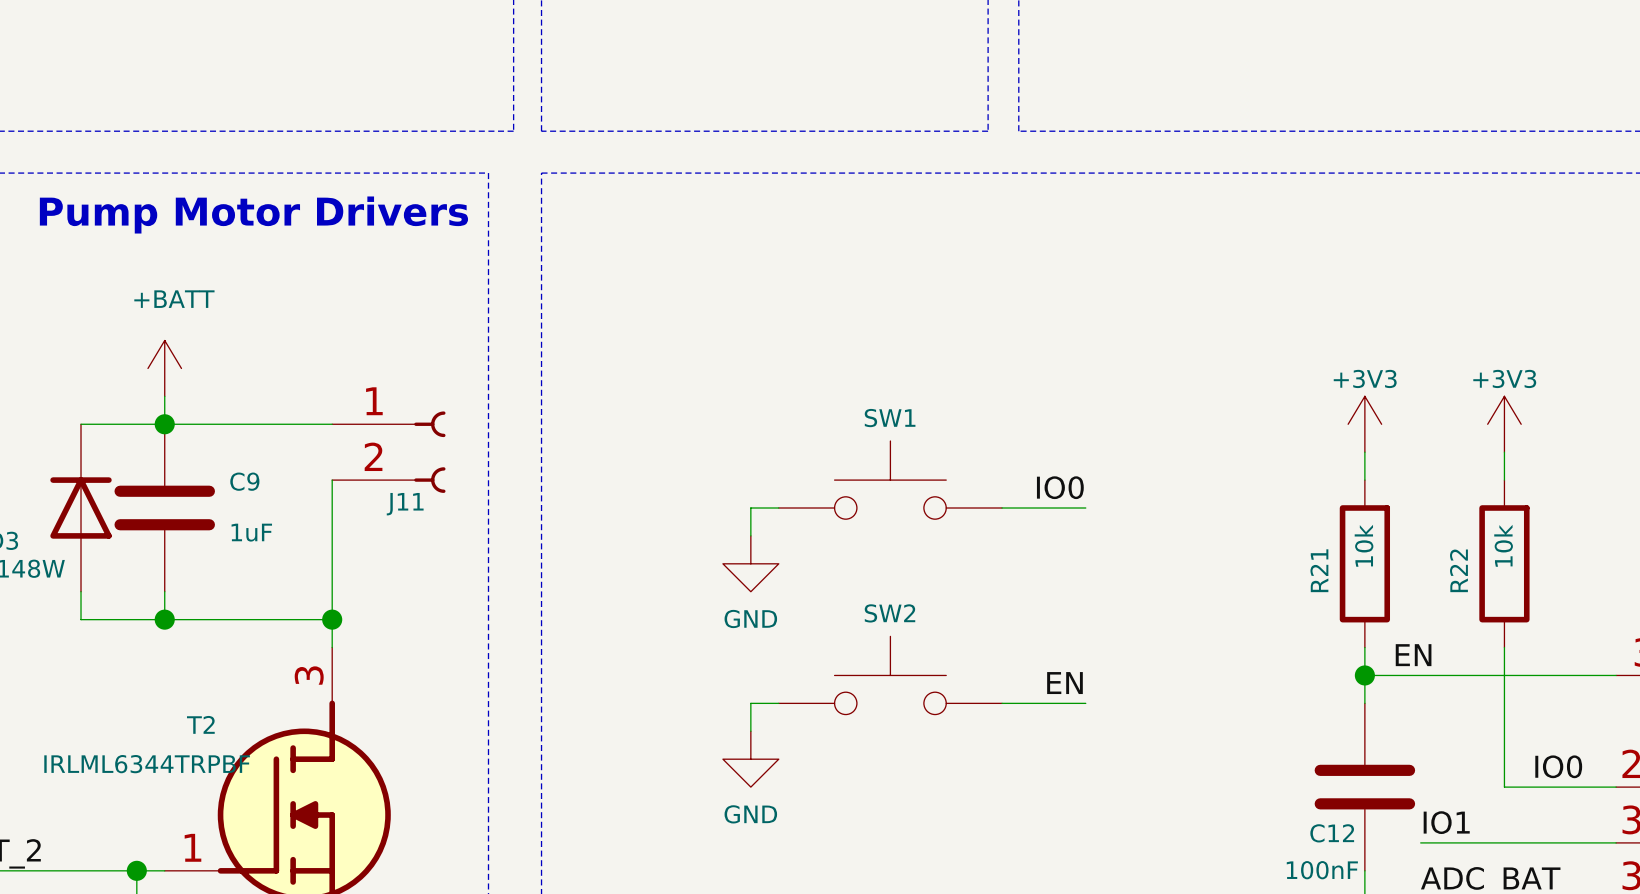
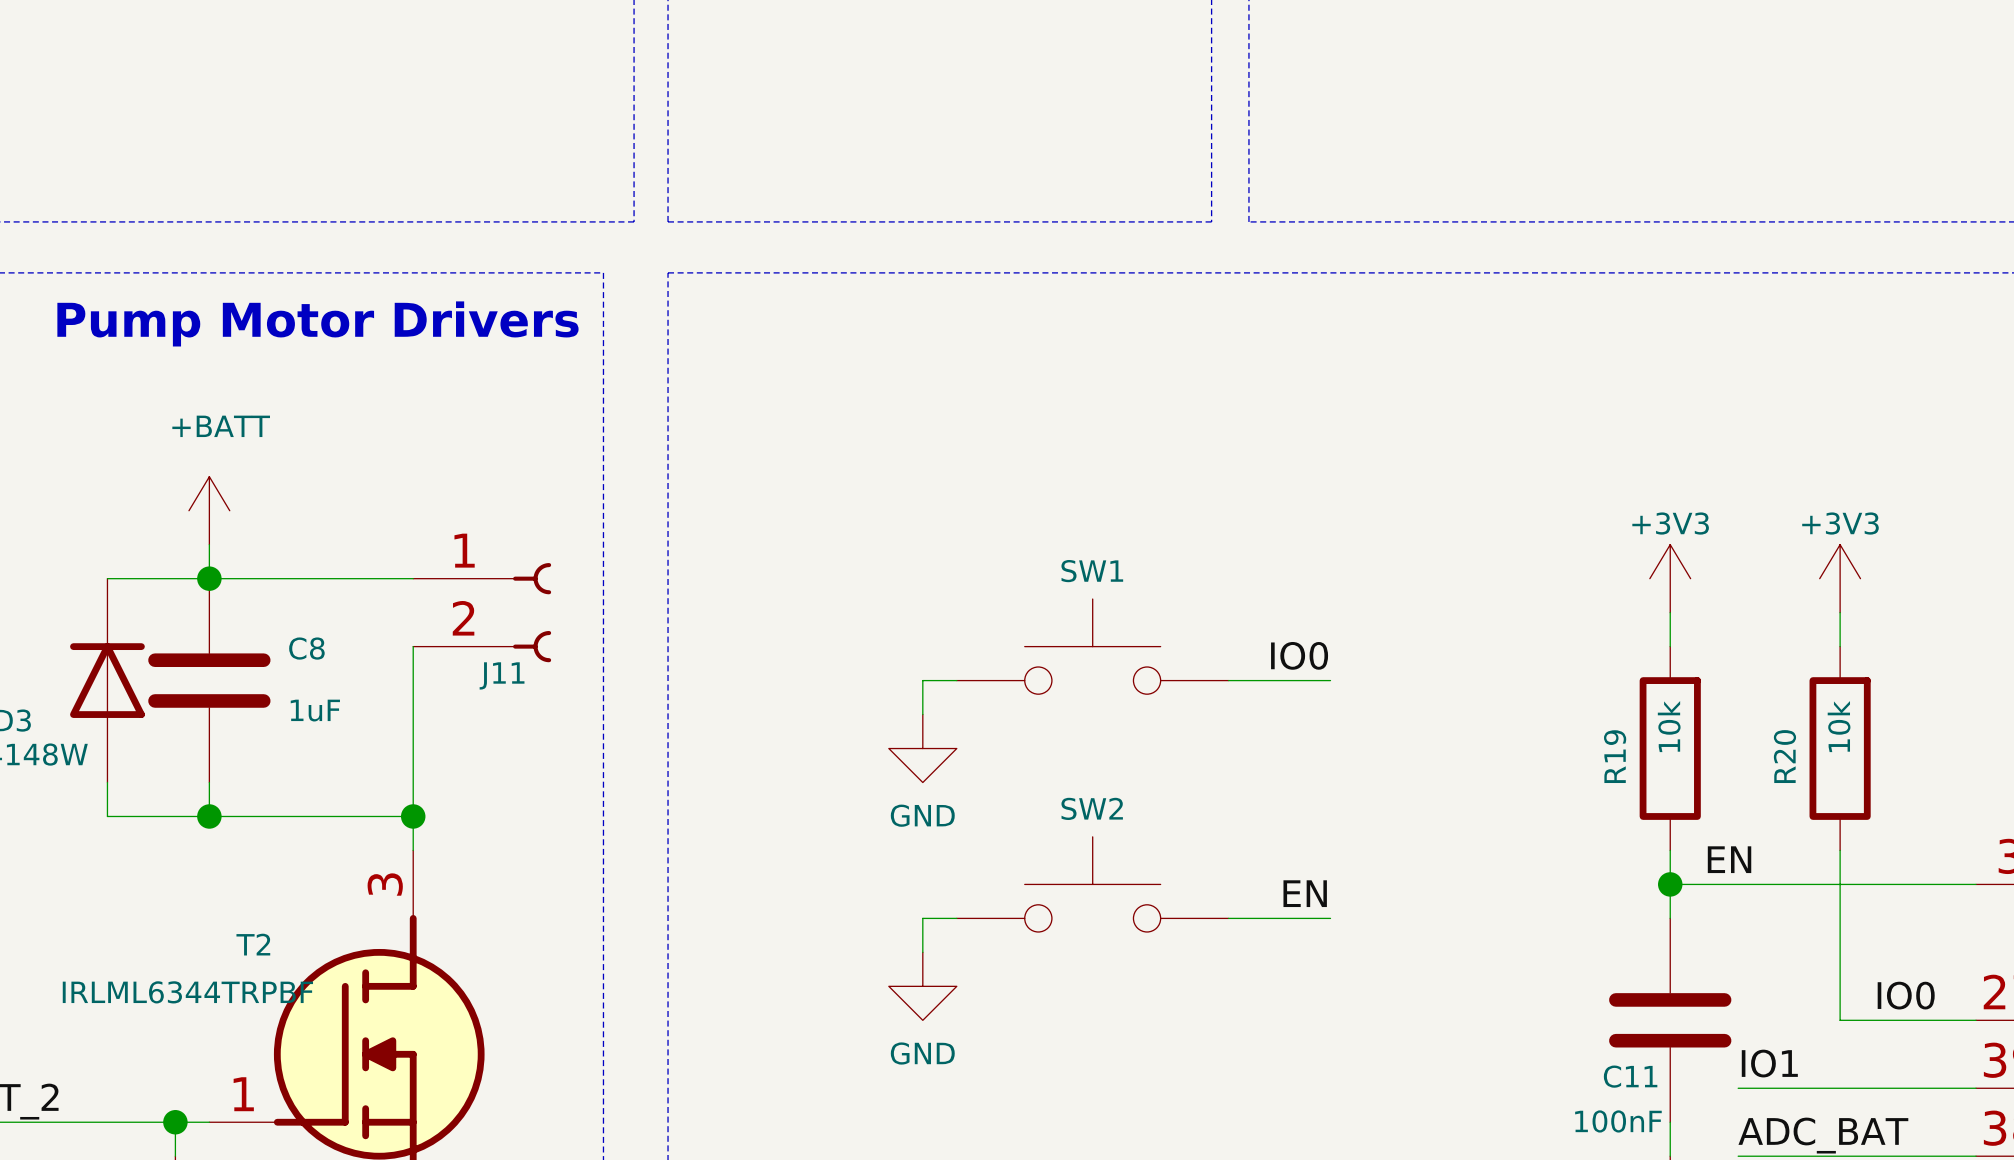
C9 name: C9 (244, 481) -> C8 (306, 648)
R21 name: R21 (1319, 570) -> R19 (1615, 756)
R22 name: R22 (1458, 570) -> R20 (1784, 756)
C12 name: C12 (1332, 833) -> C11 (1630, 1076)

